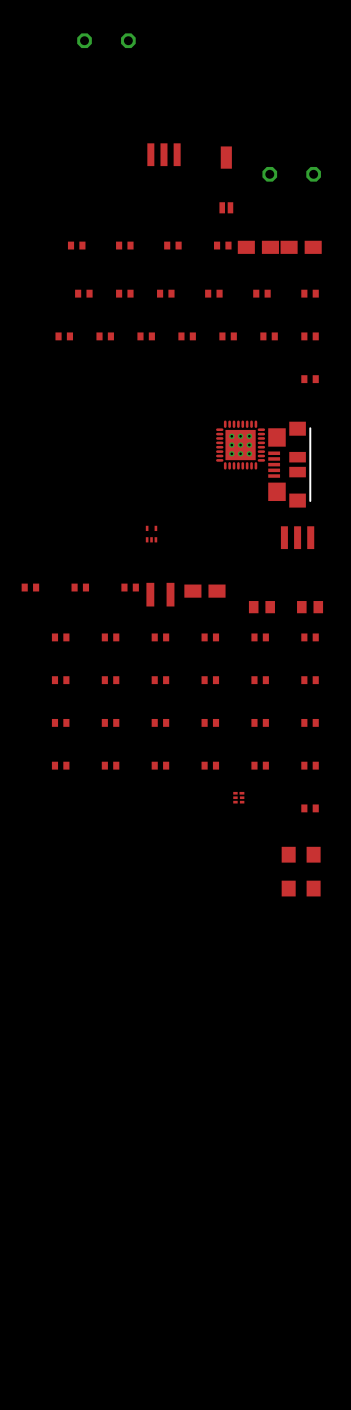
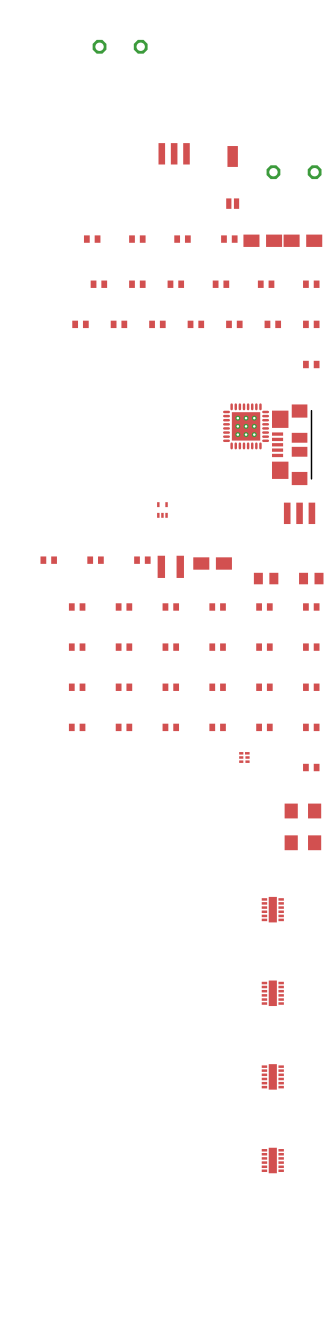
part: none -> (272, 909)
part: none -> (272, 993)
part: none -> (272, 1076)
part: none -> (272, 1160)

